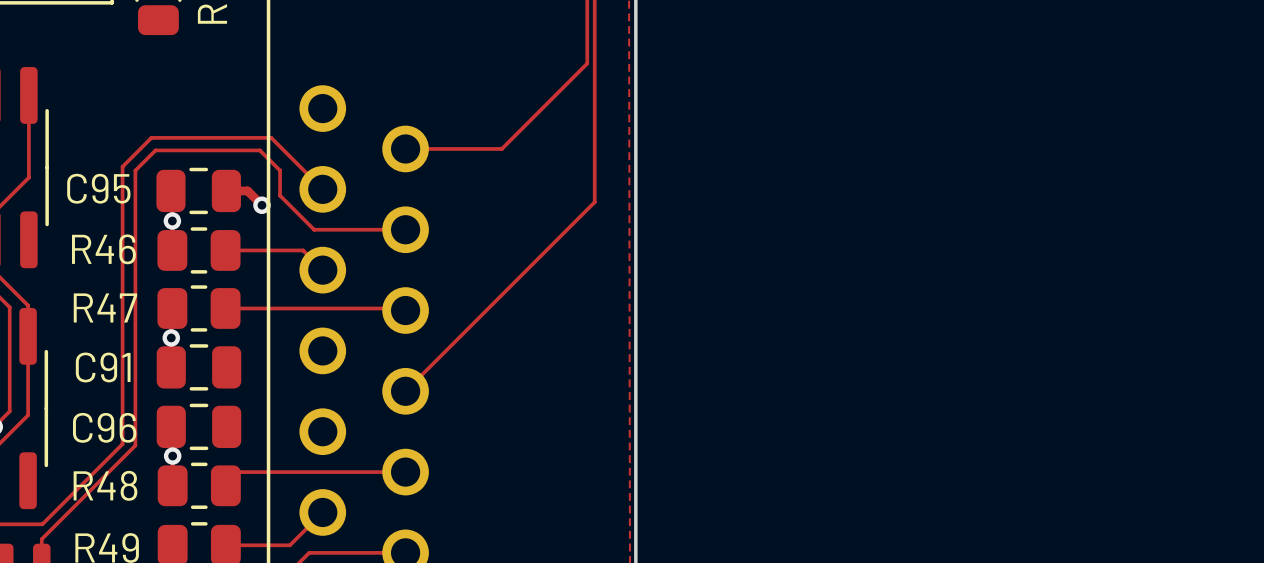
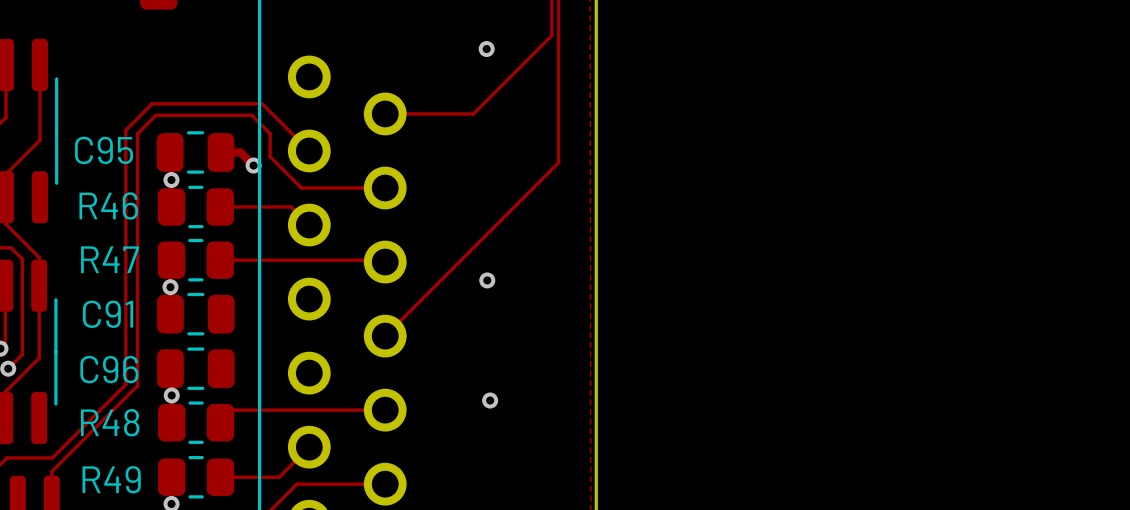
via: none -> (486, 49)
via: none -> (487, 280)
via: none -> (490, 400)

